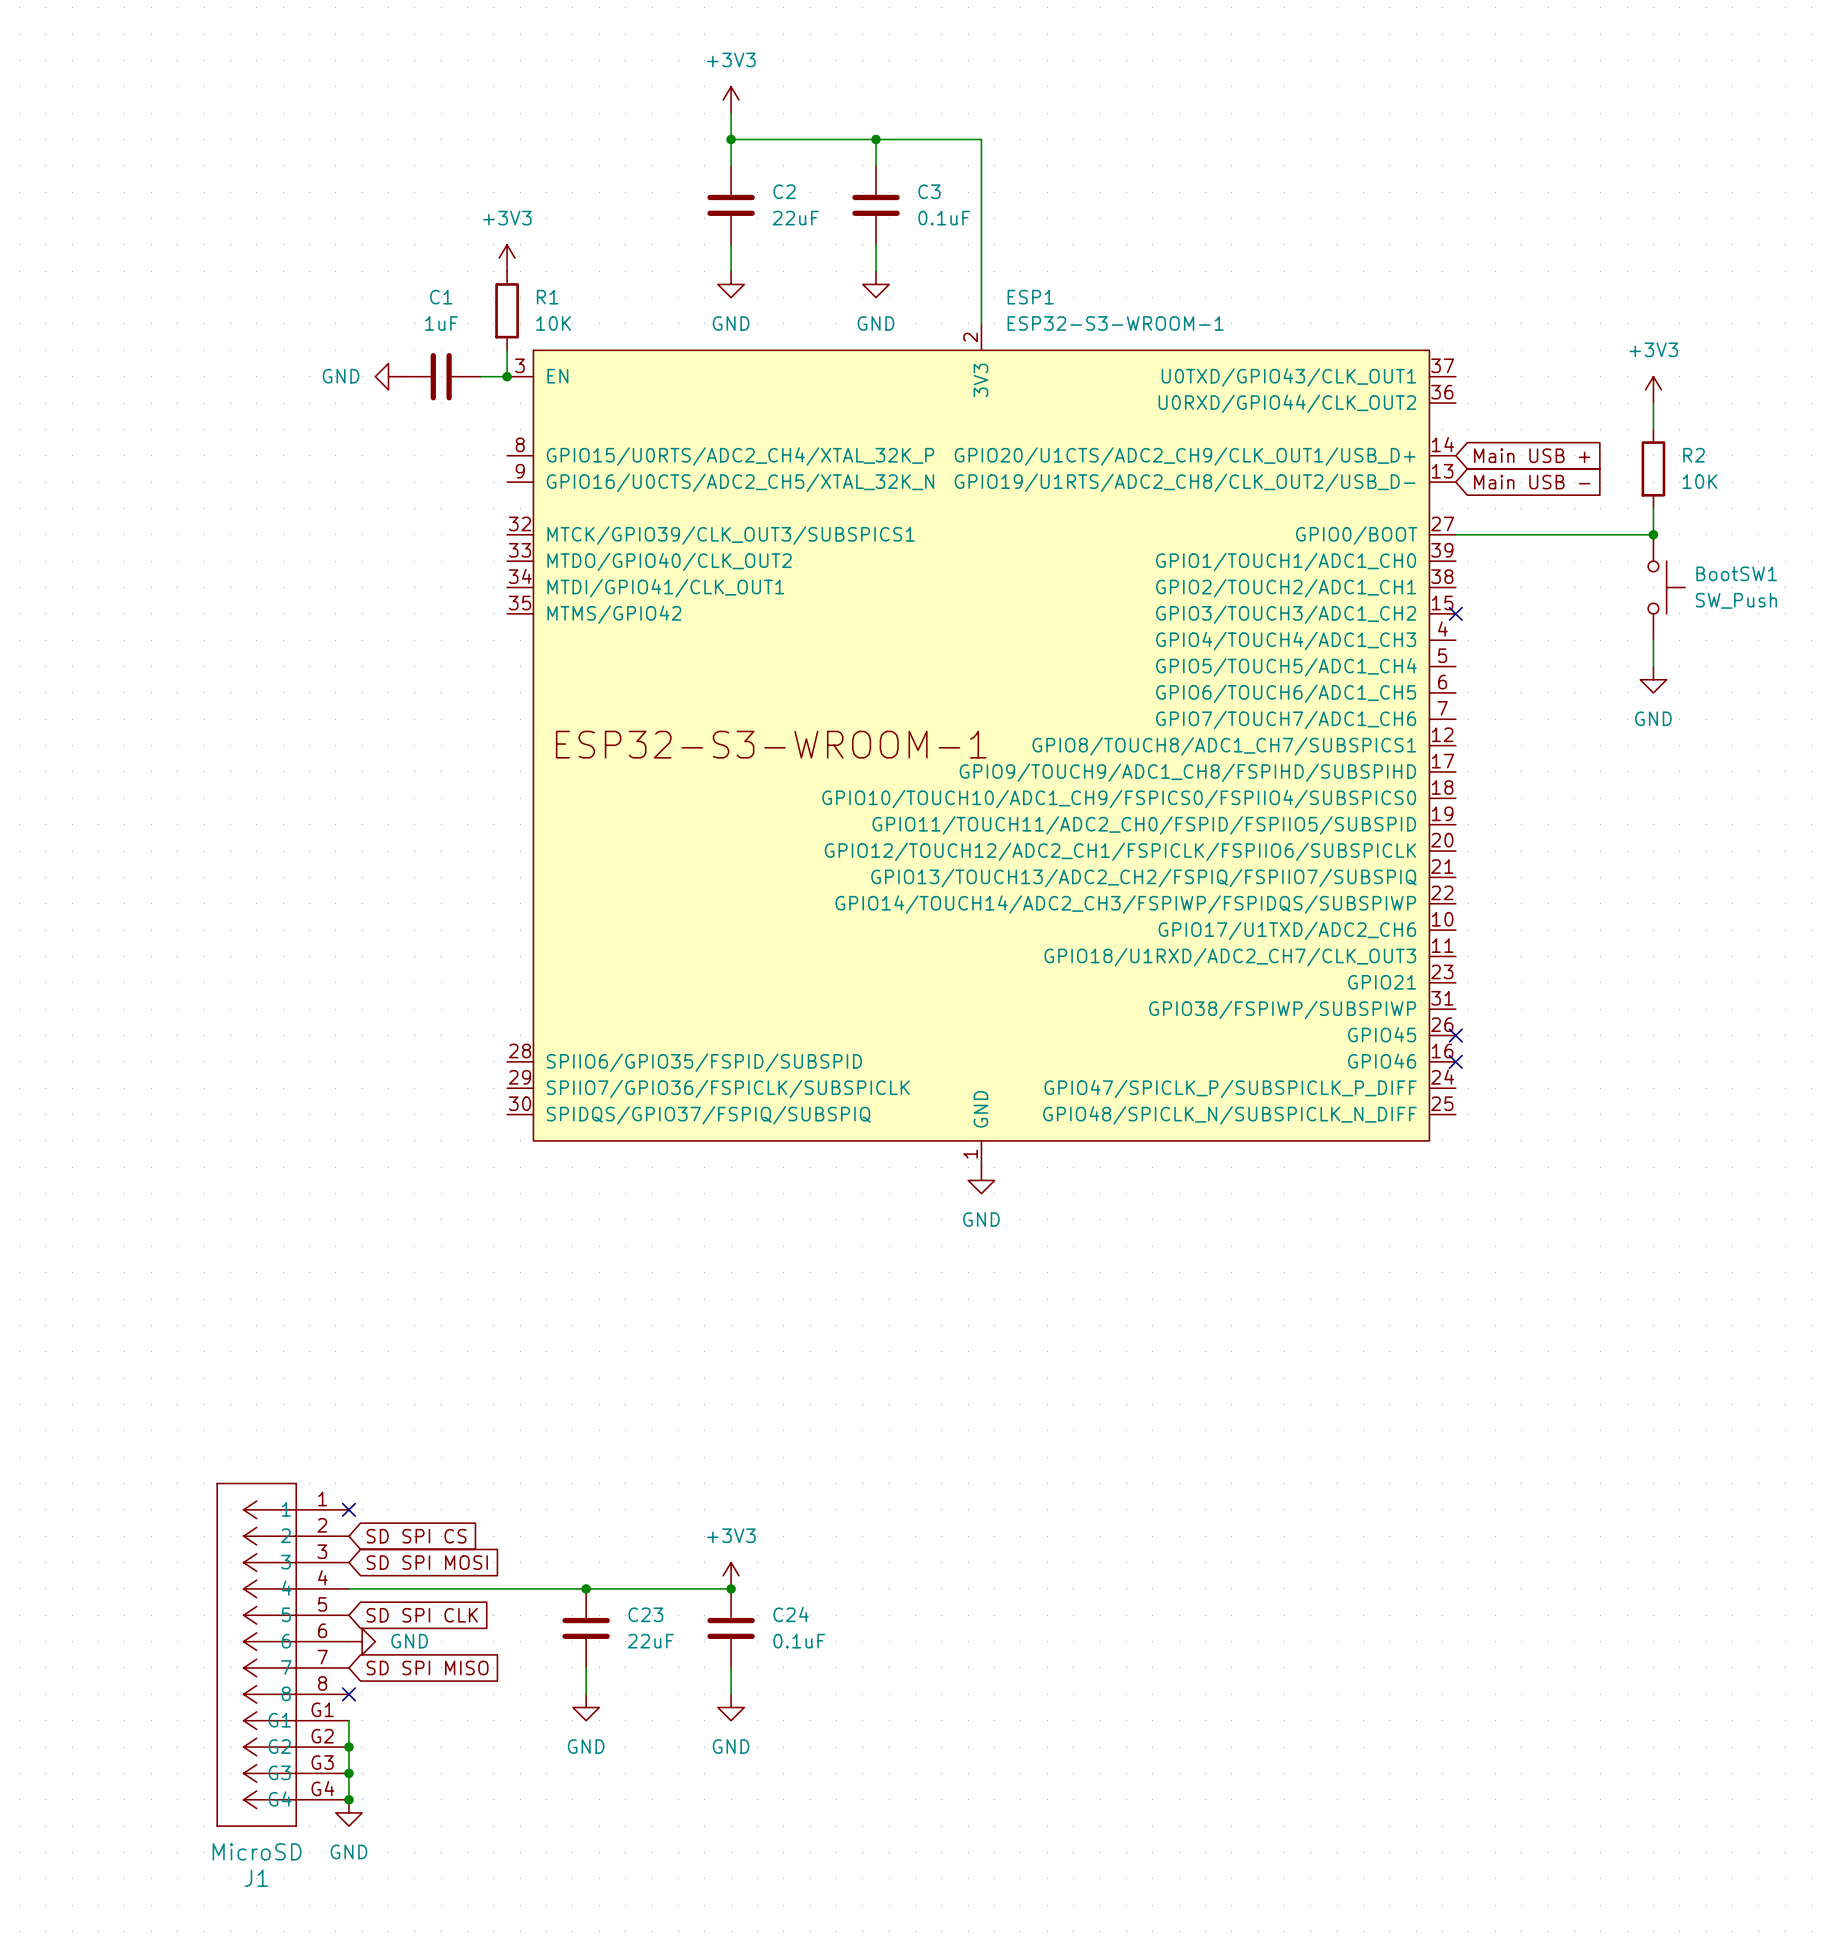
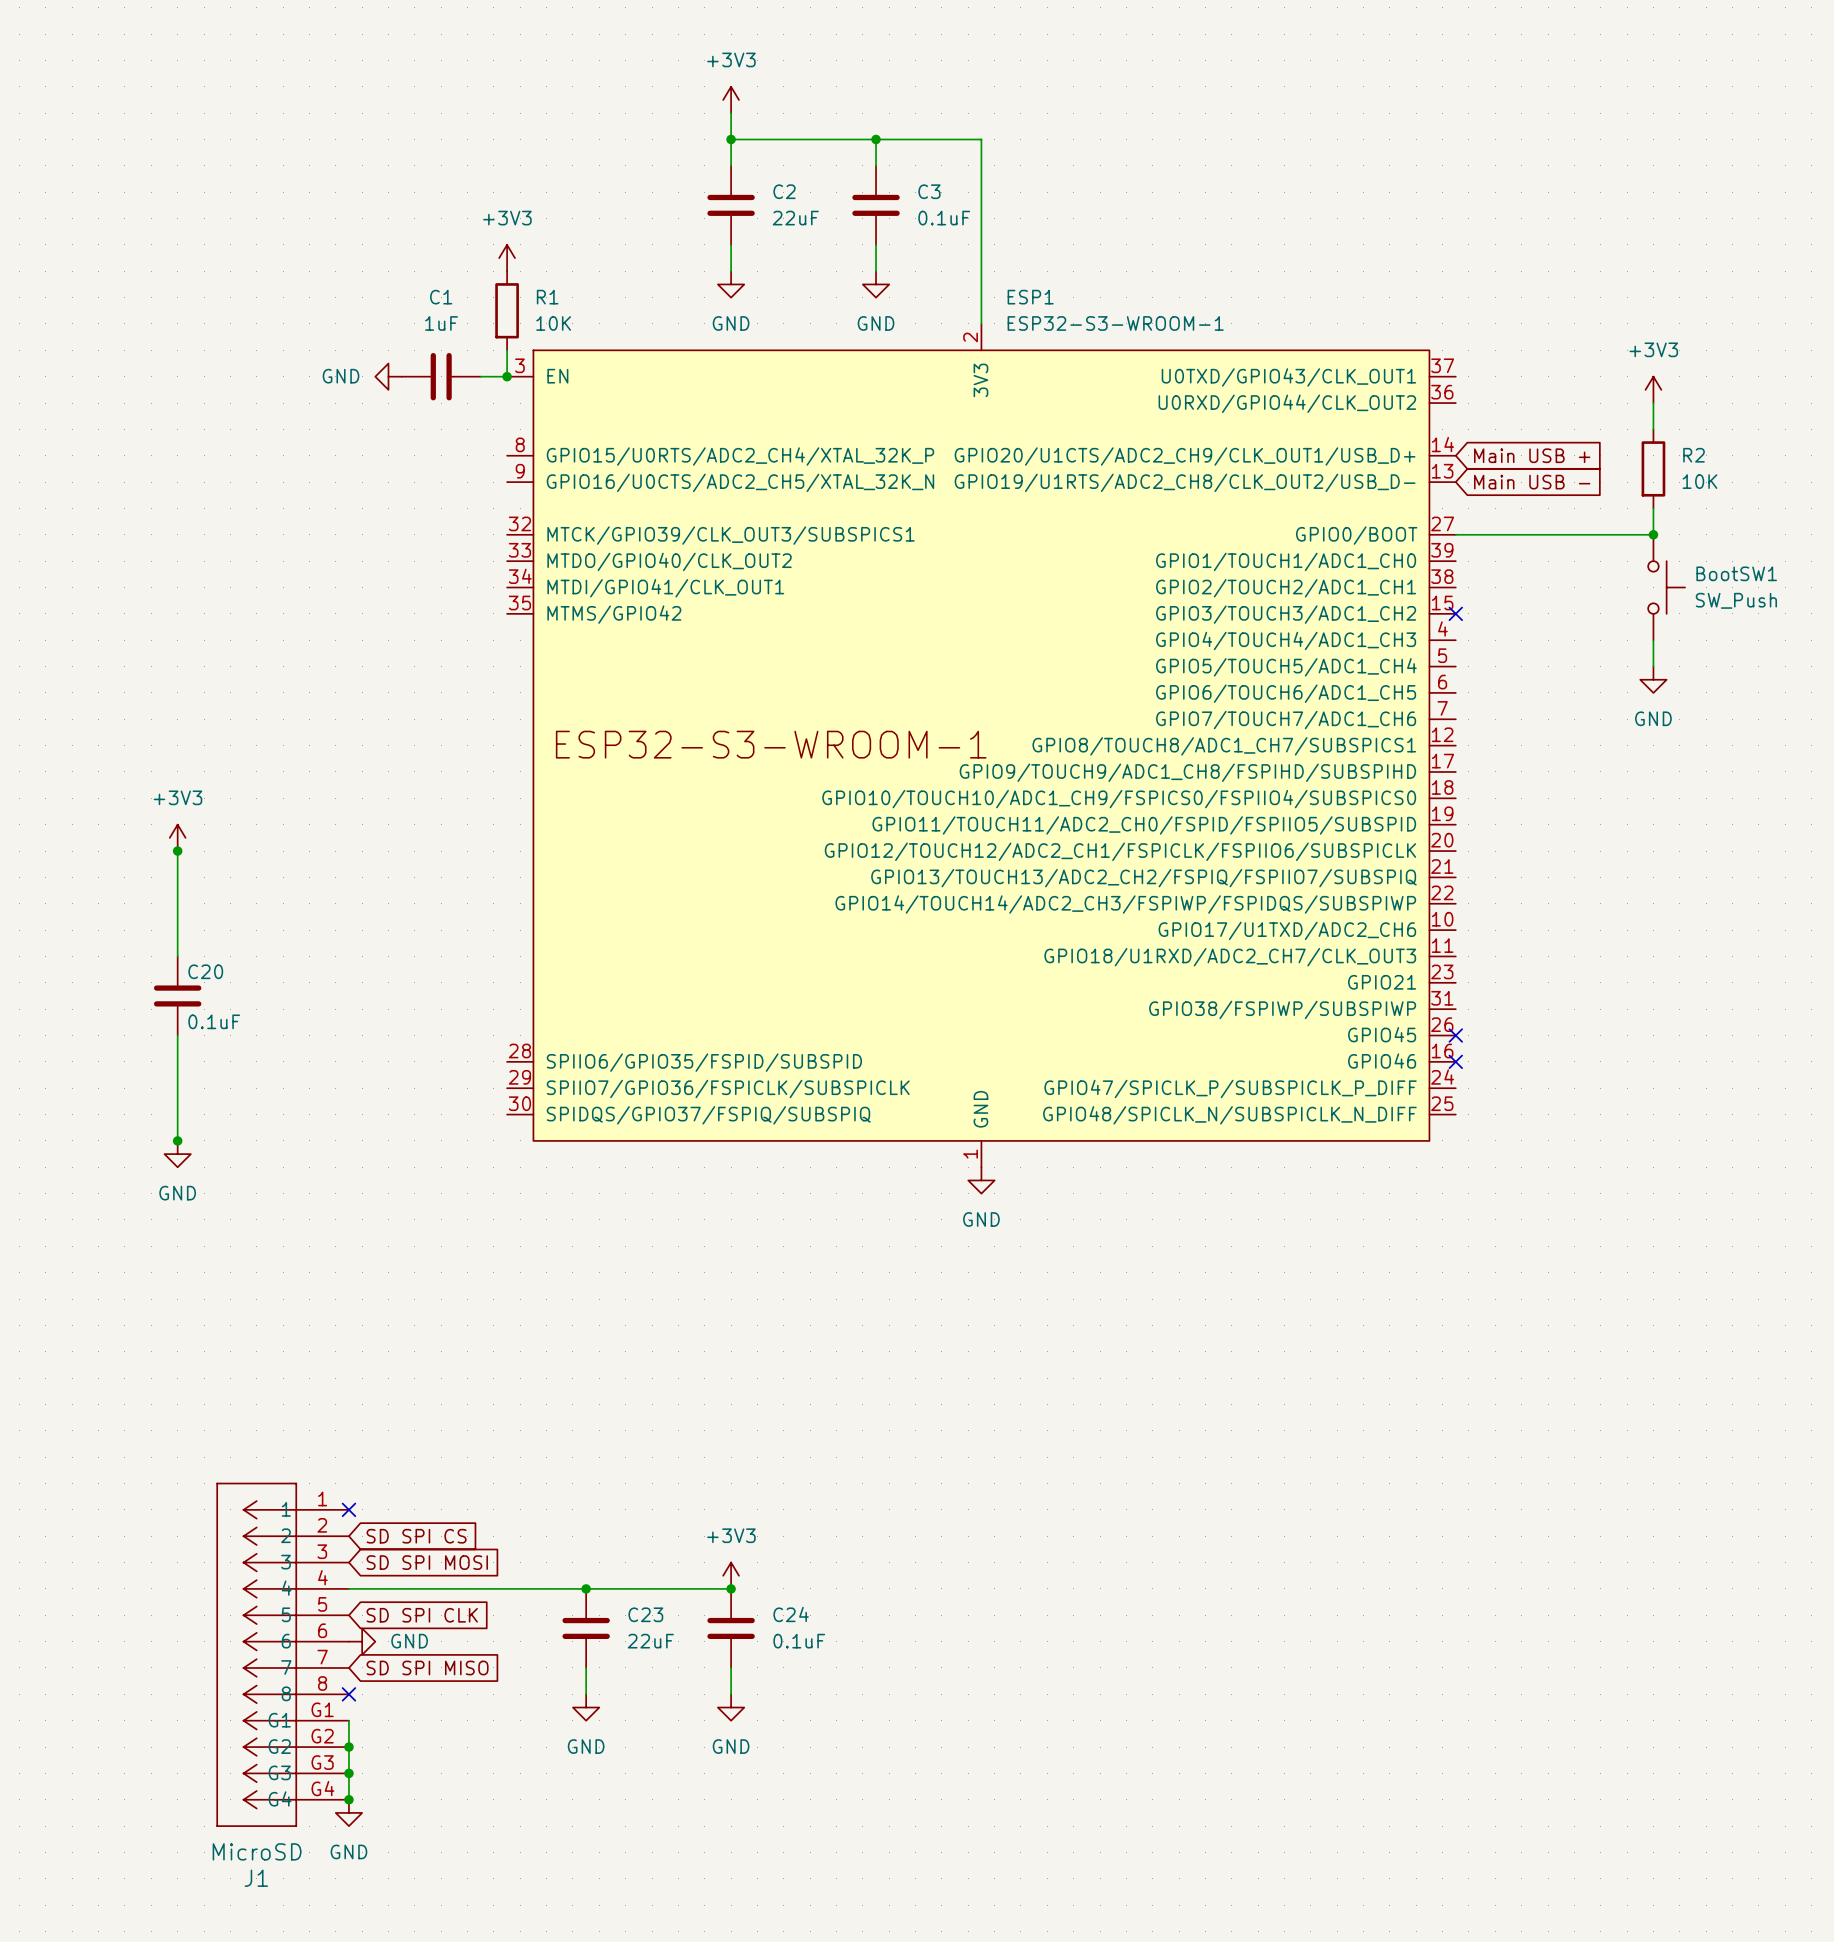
power symbol: none -> +3V3 (177, 837)
wire: none -> (177, 851) (177, 956)
junction: none -> (177, 851)
C20: none -> 0.1uF (177, 995)
wire: none -> (177, 1035) (177, 1140)
junction: none -> (177, 1140)
power symbol: none -> GND (177, 1154)

